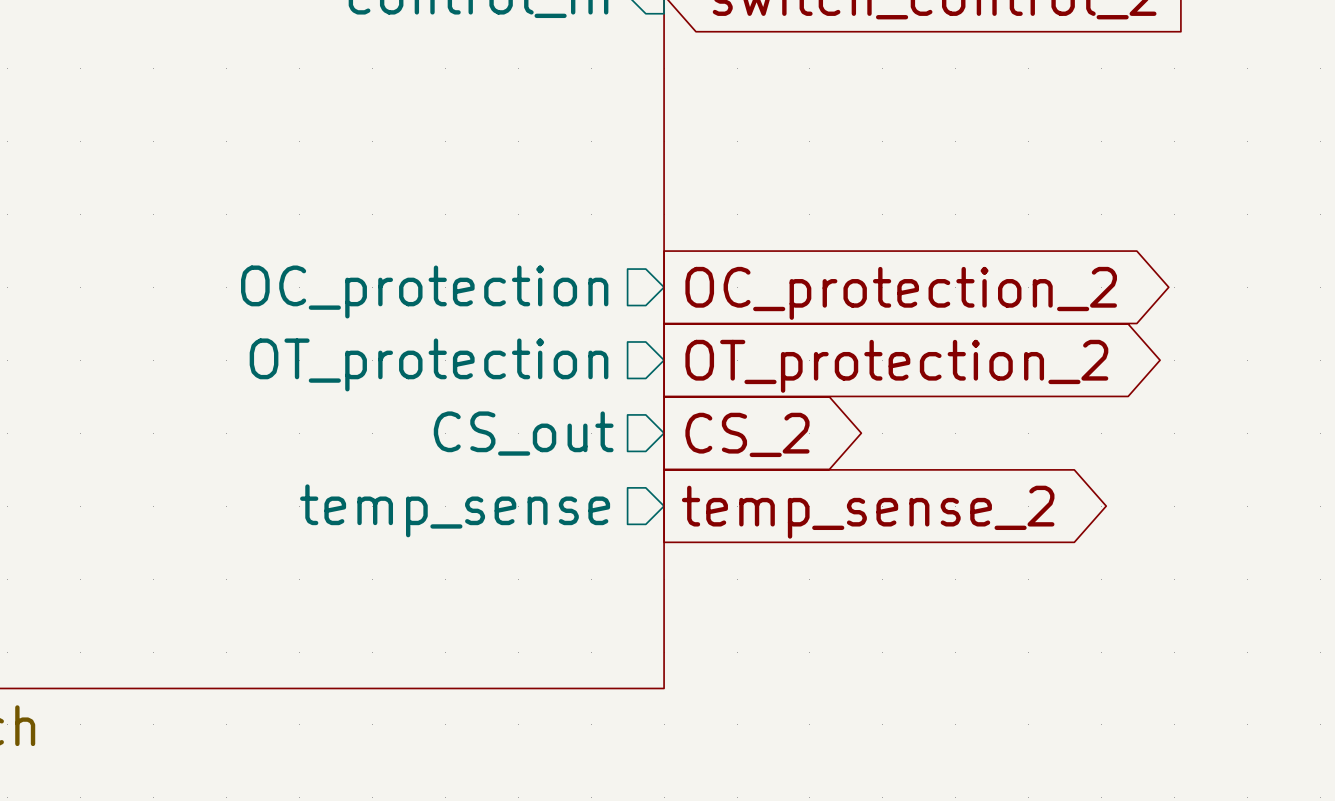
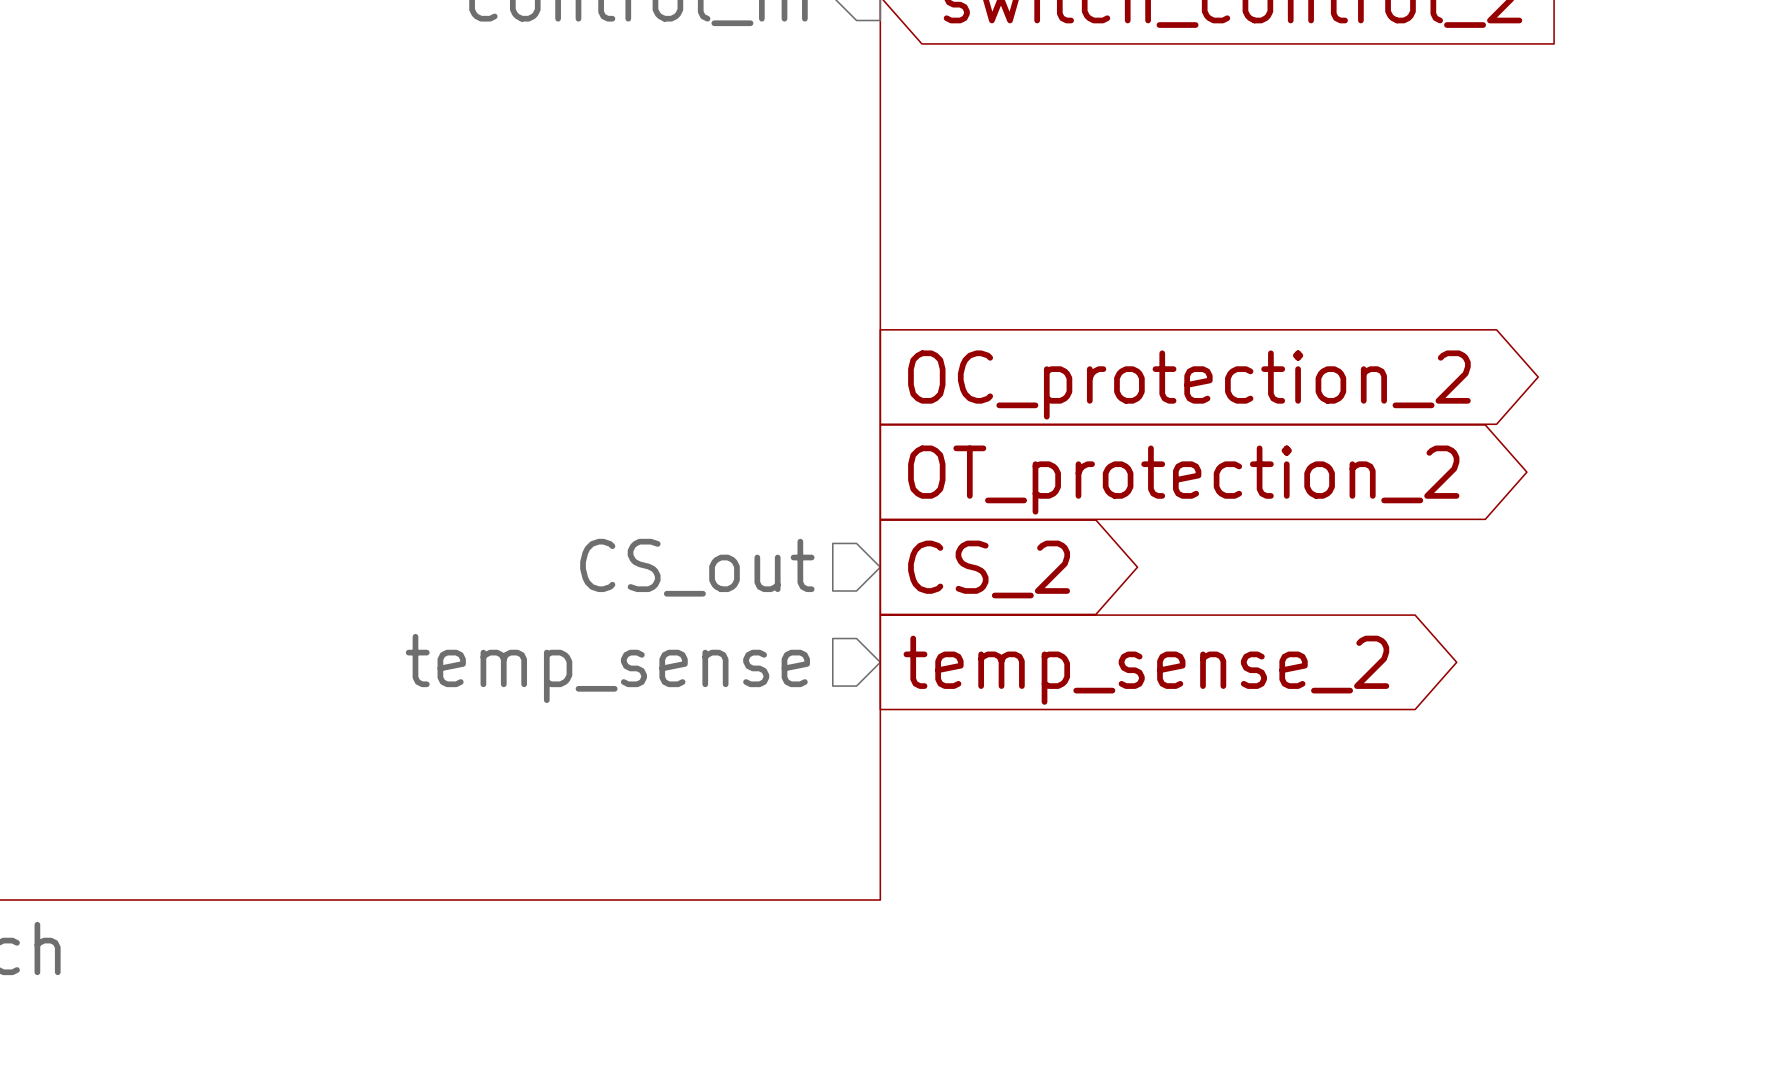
sheet pin: OC_protection (424, 292) -> none
sheet pin: OT_protection (429, 364) -> none

